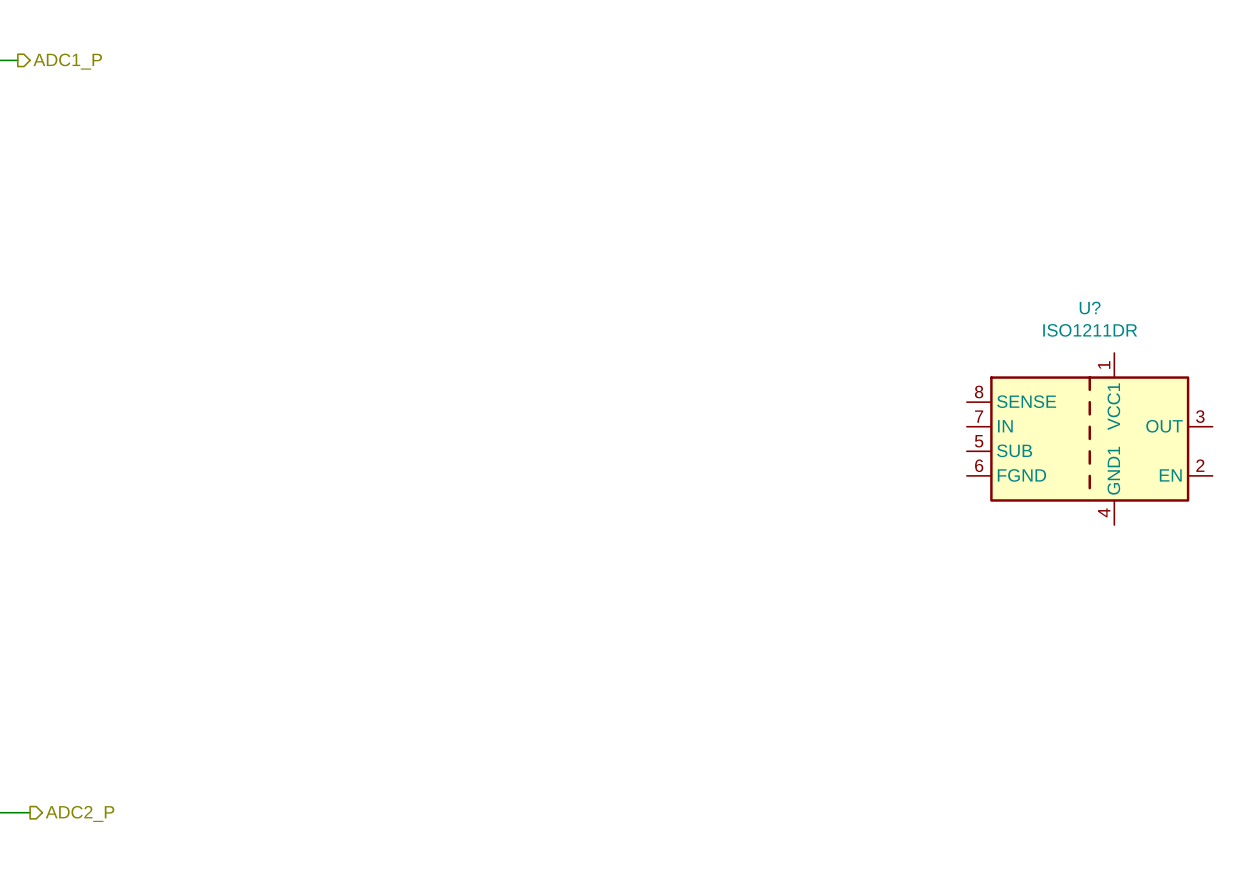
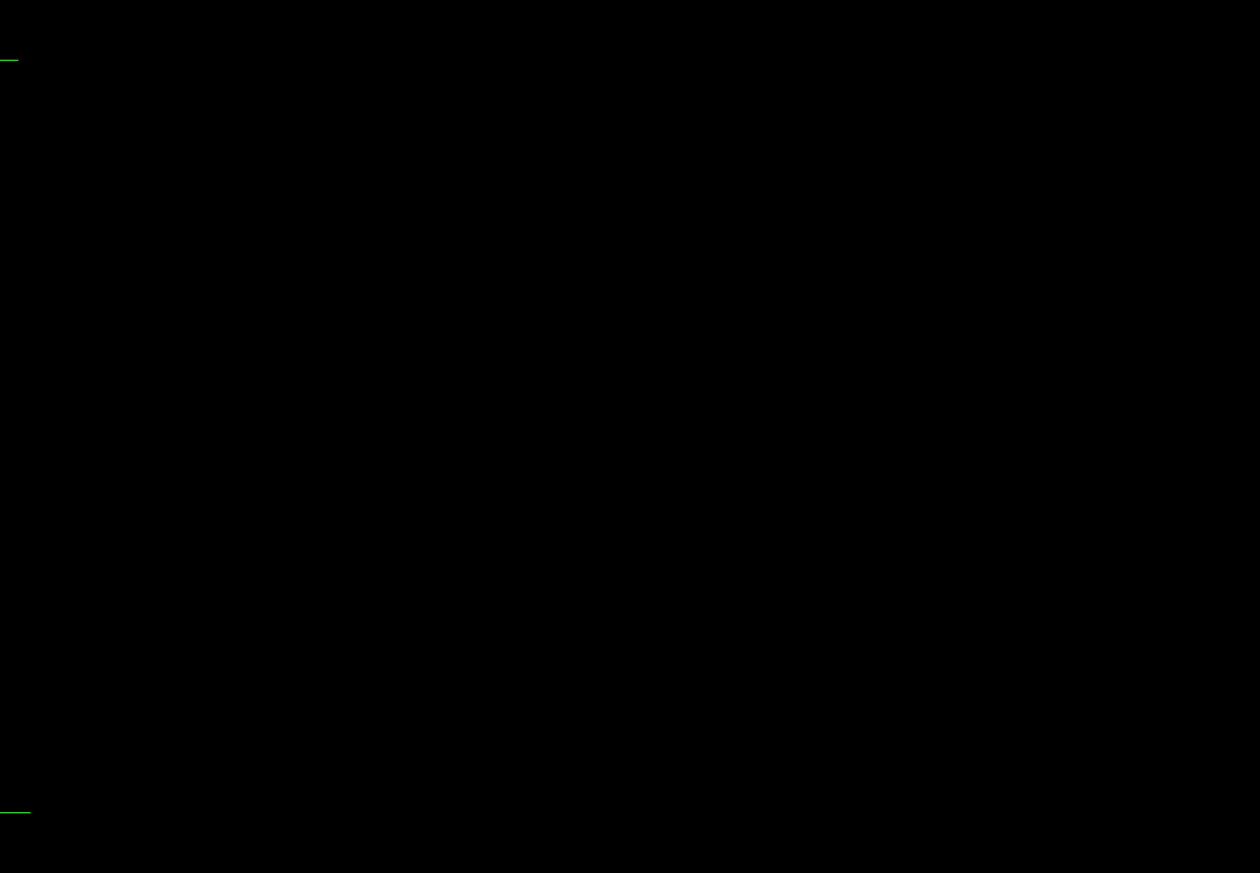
hierarchical label: ADC1_P (67, 61) -> none
U?: ISO1211DR (1089, 439) -> none
hierarchical label: ADC2_P (80, 813) -> none

